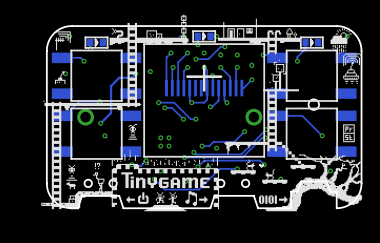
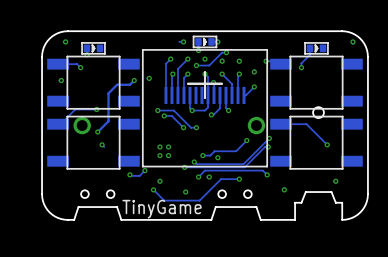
drawing: [41, 14, 363, 212] -> none
text: none -> TinyGame (162, 209)

